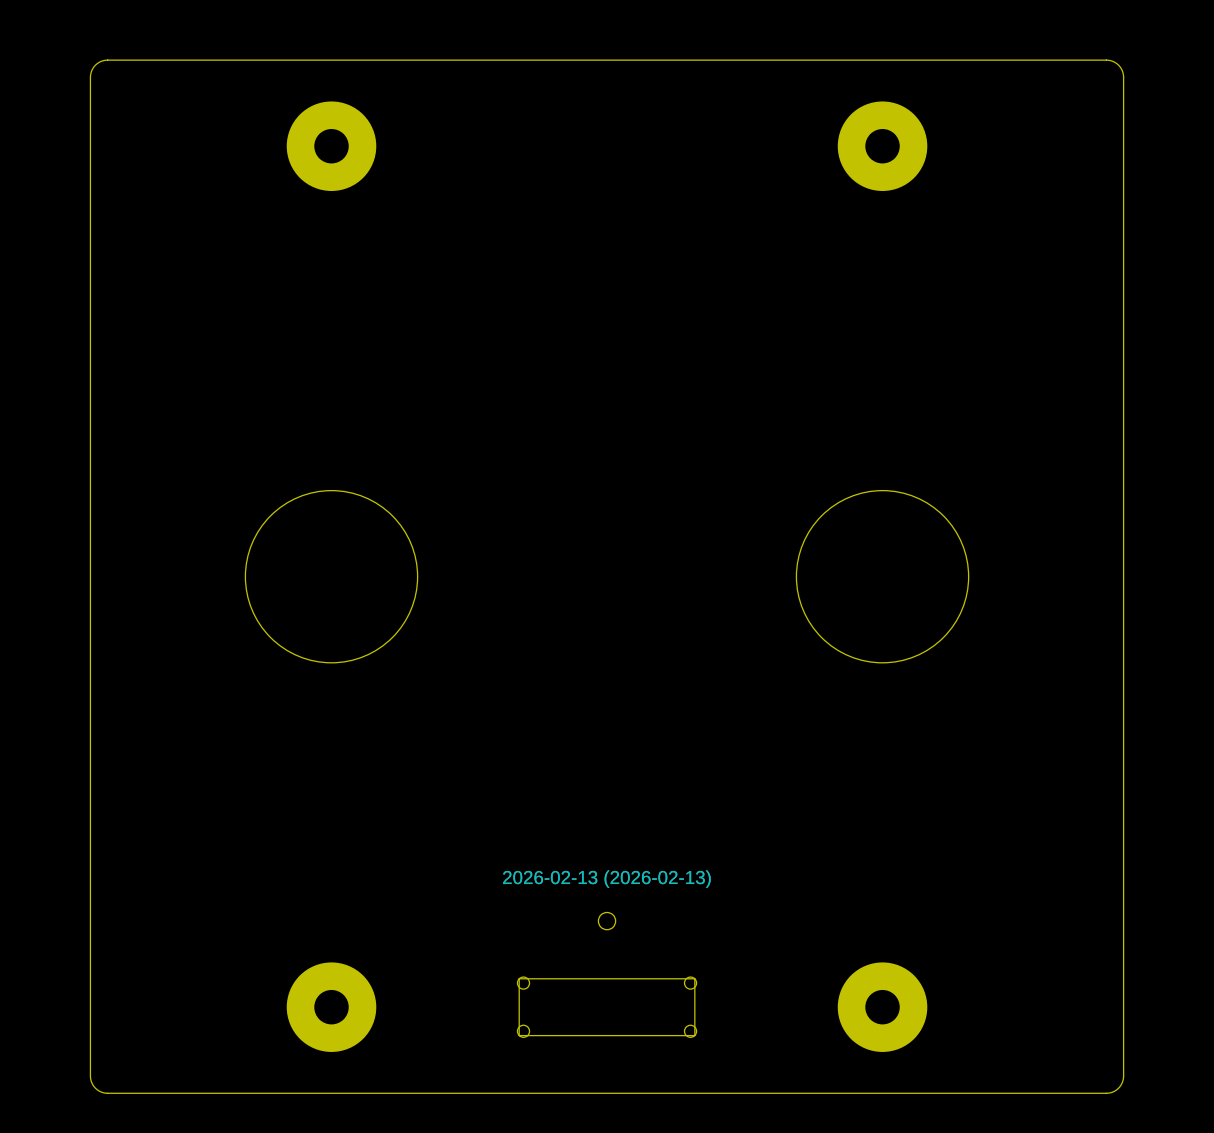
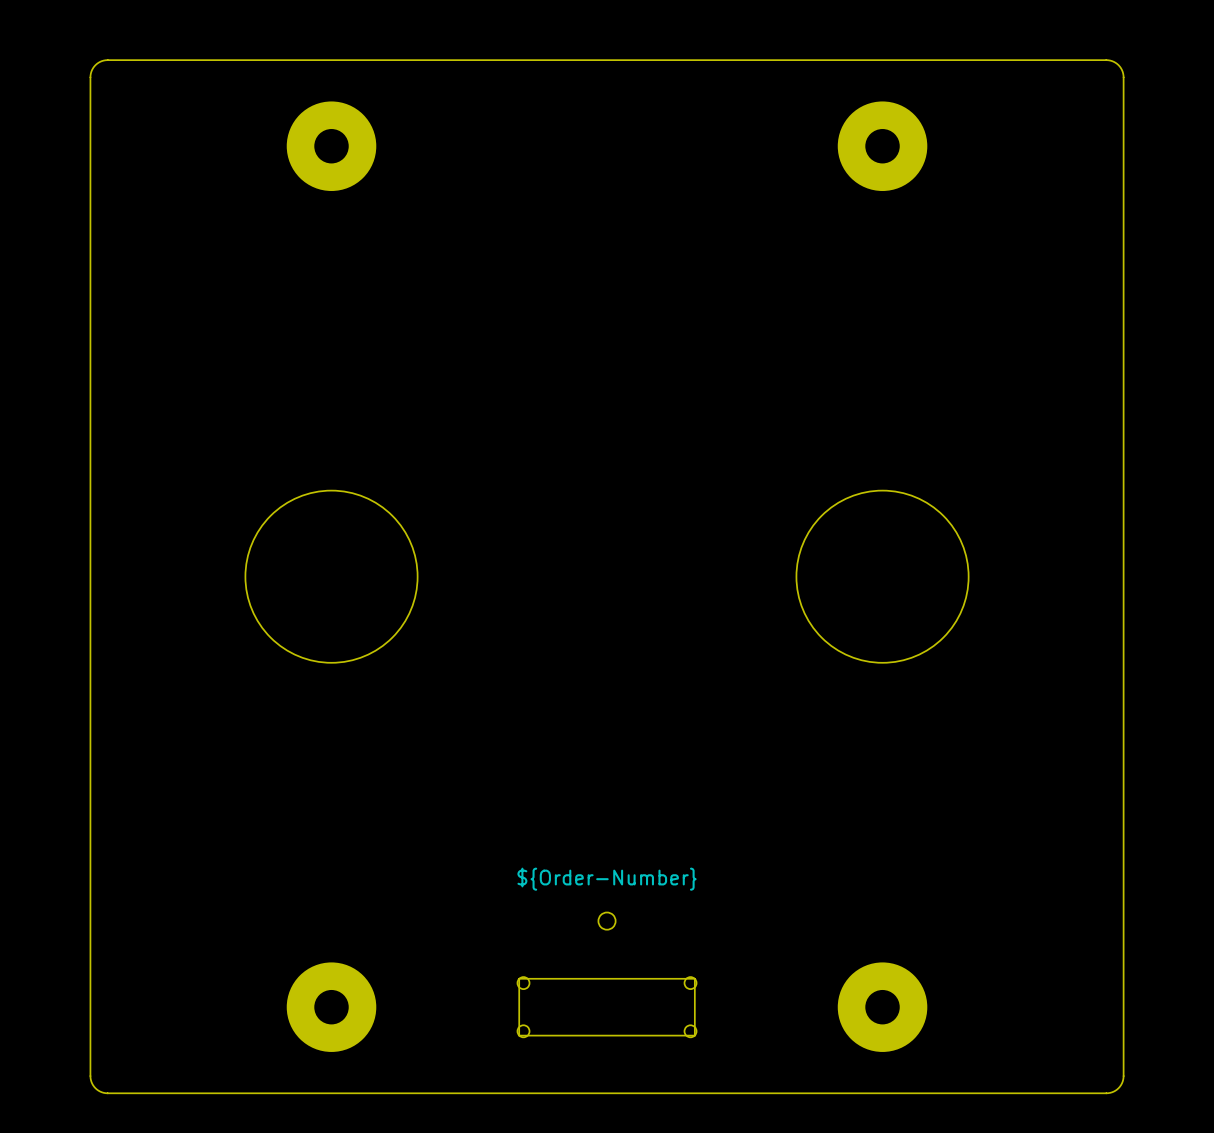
drawing shape: [503, 870, 711, 888] -> [517, 867, 697, 891]

